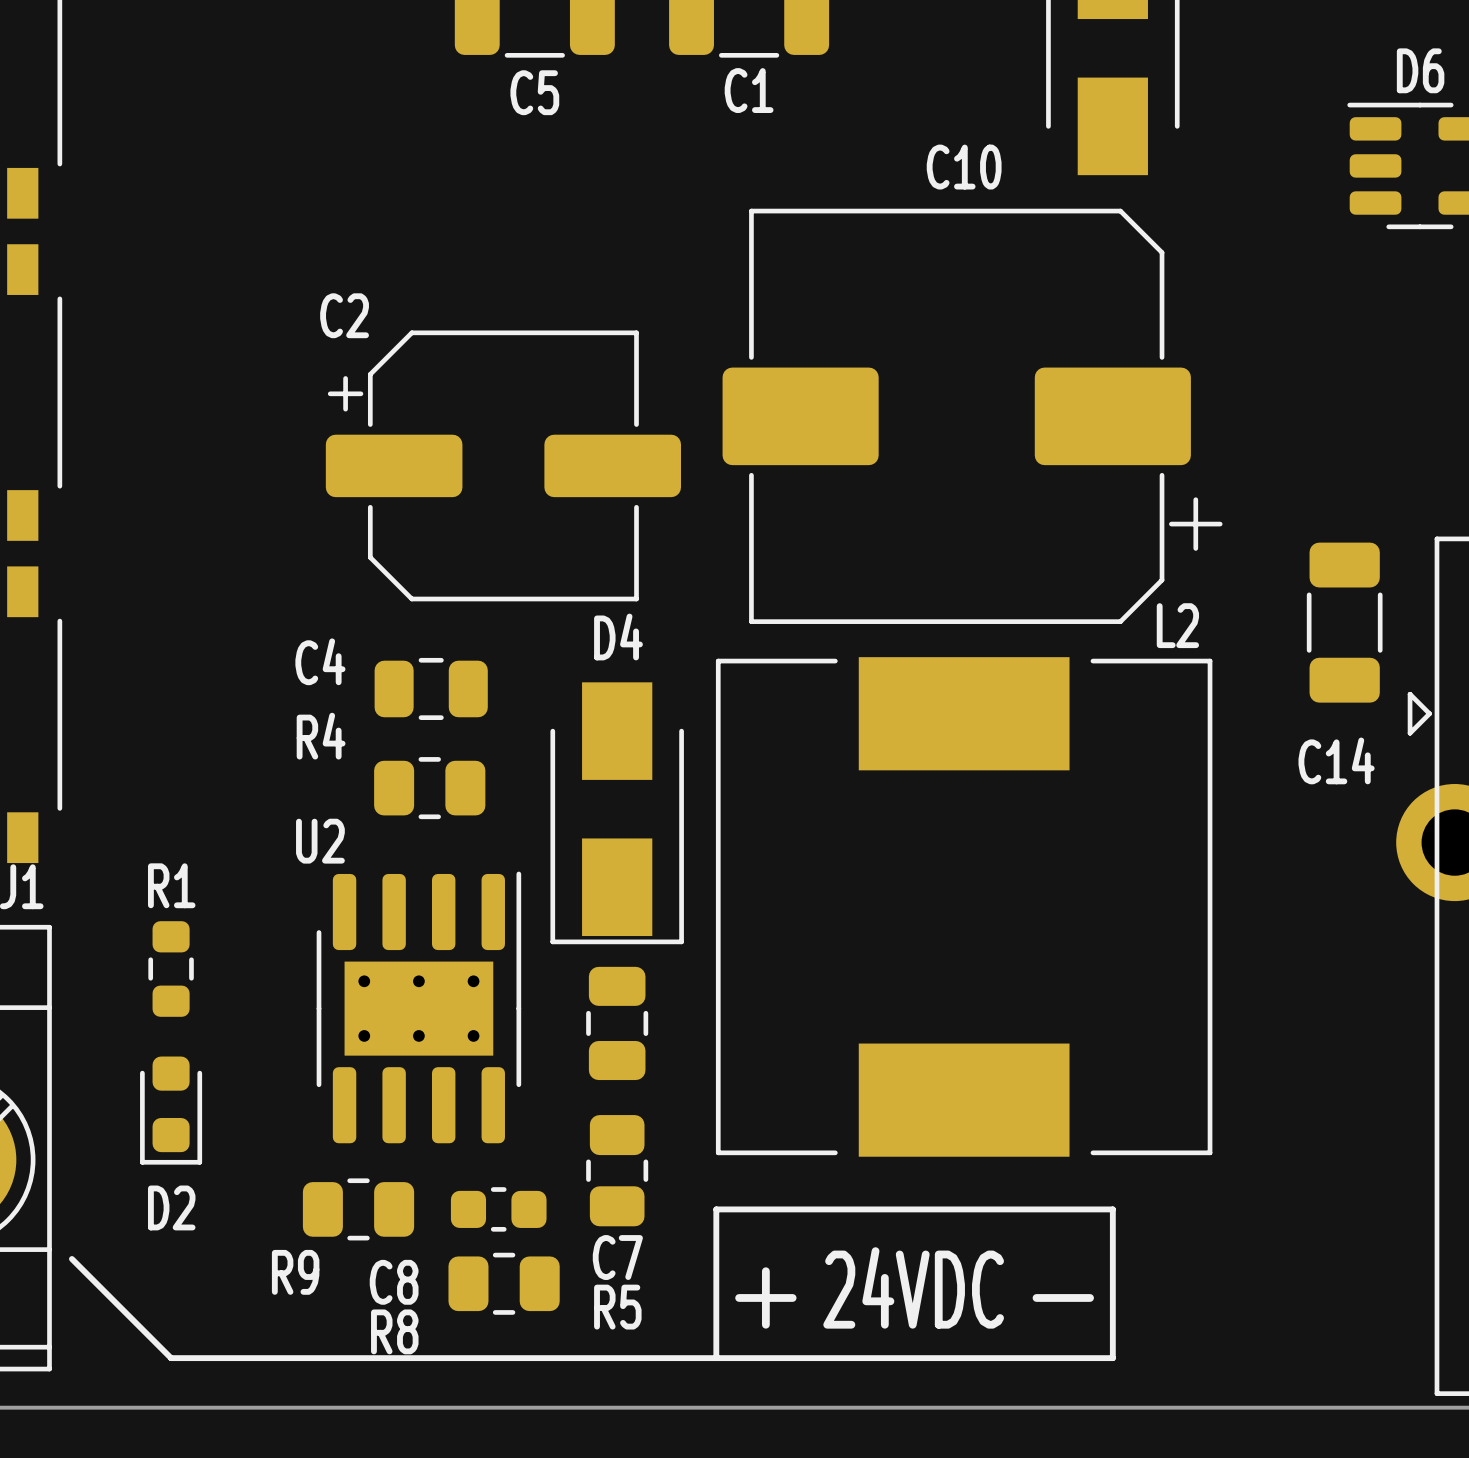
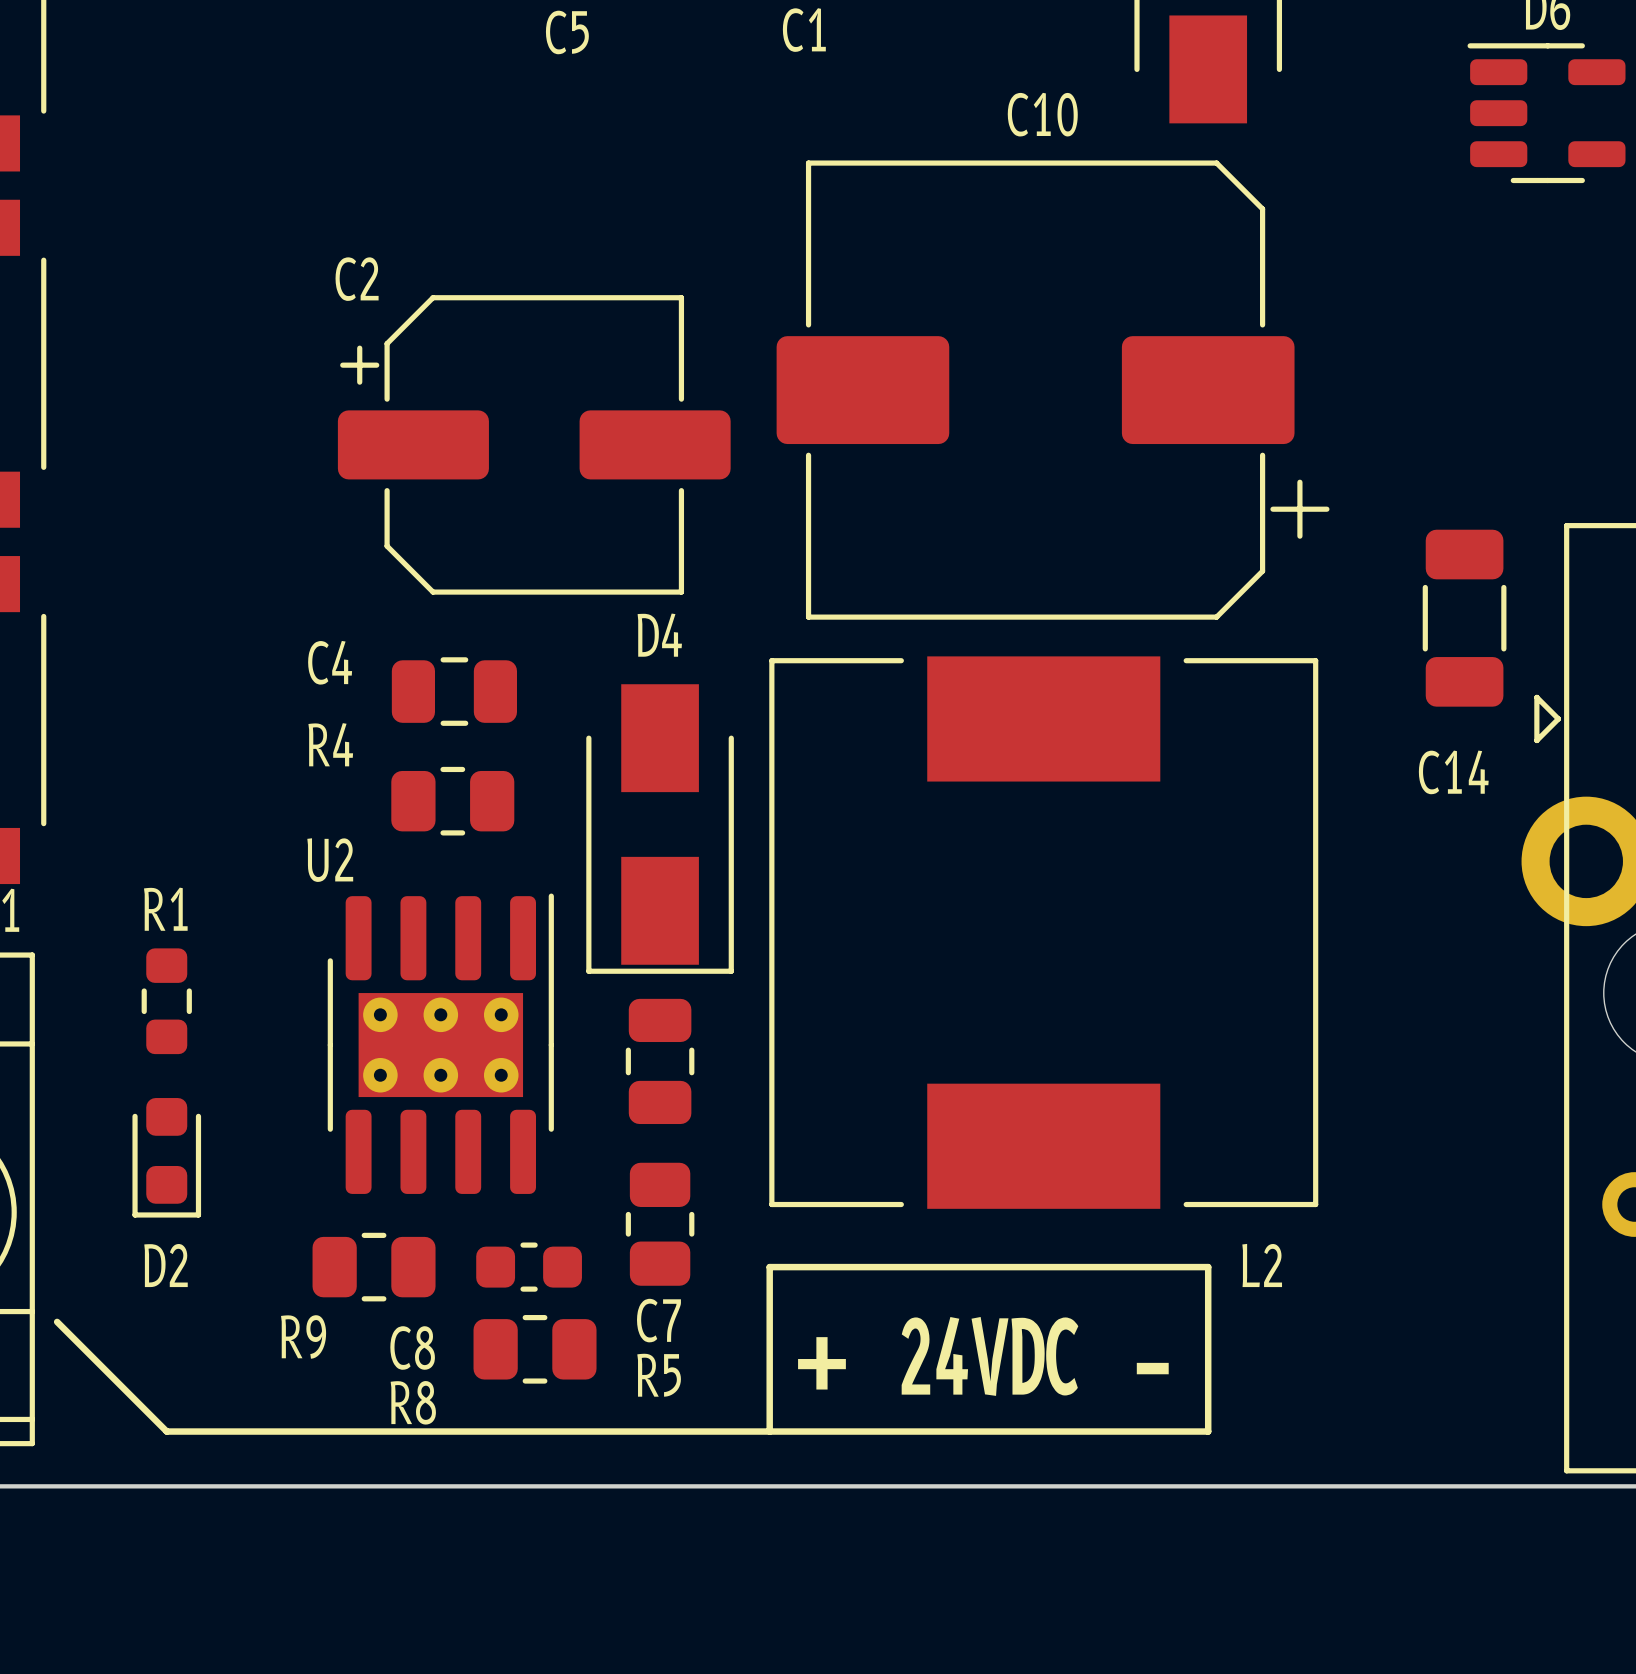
L2 name position: L2 (1177, 625) -> L2 (1262, 1265)

